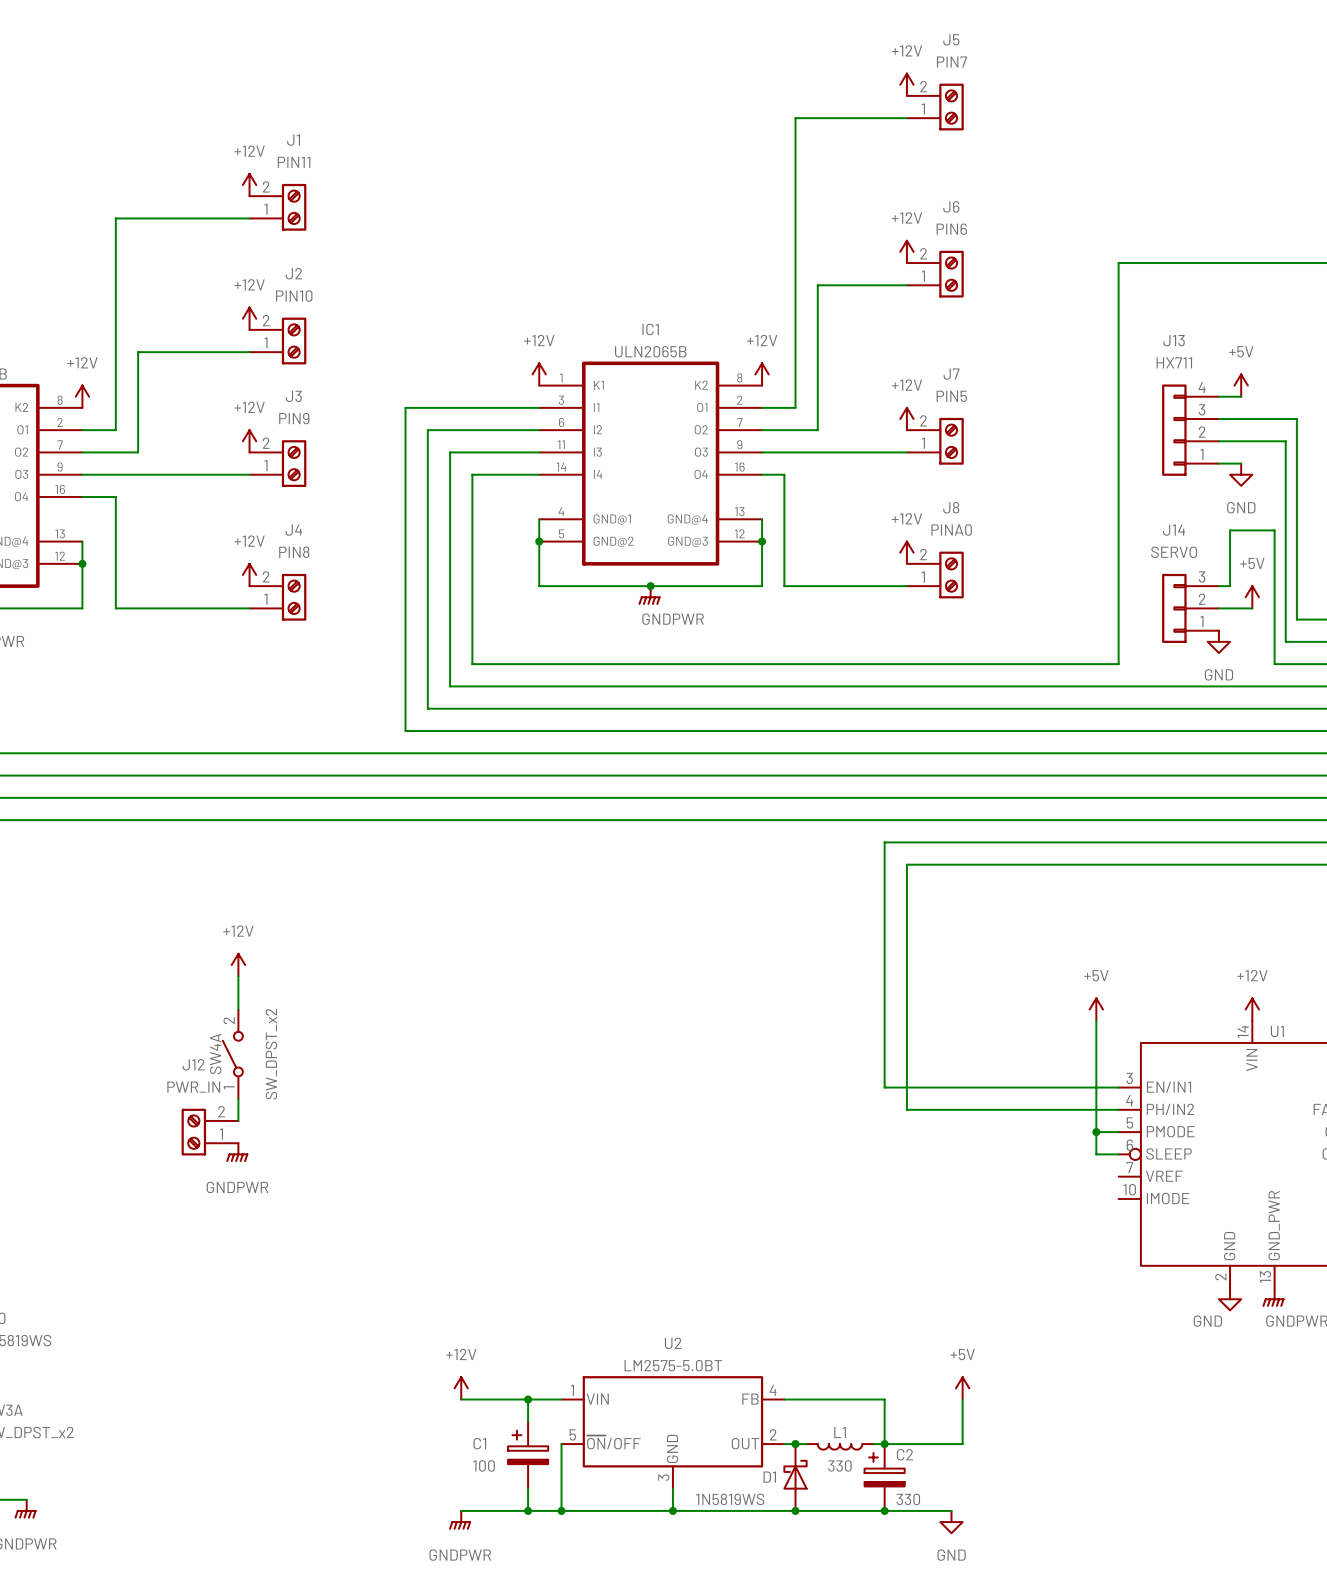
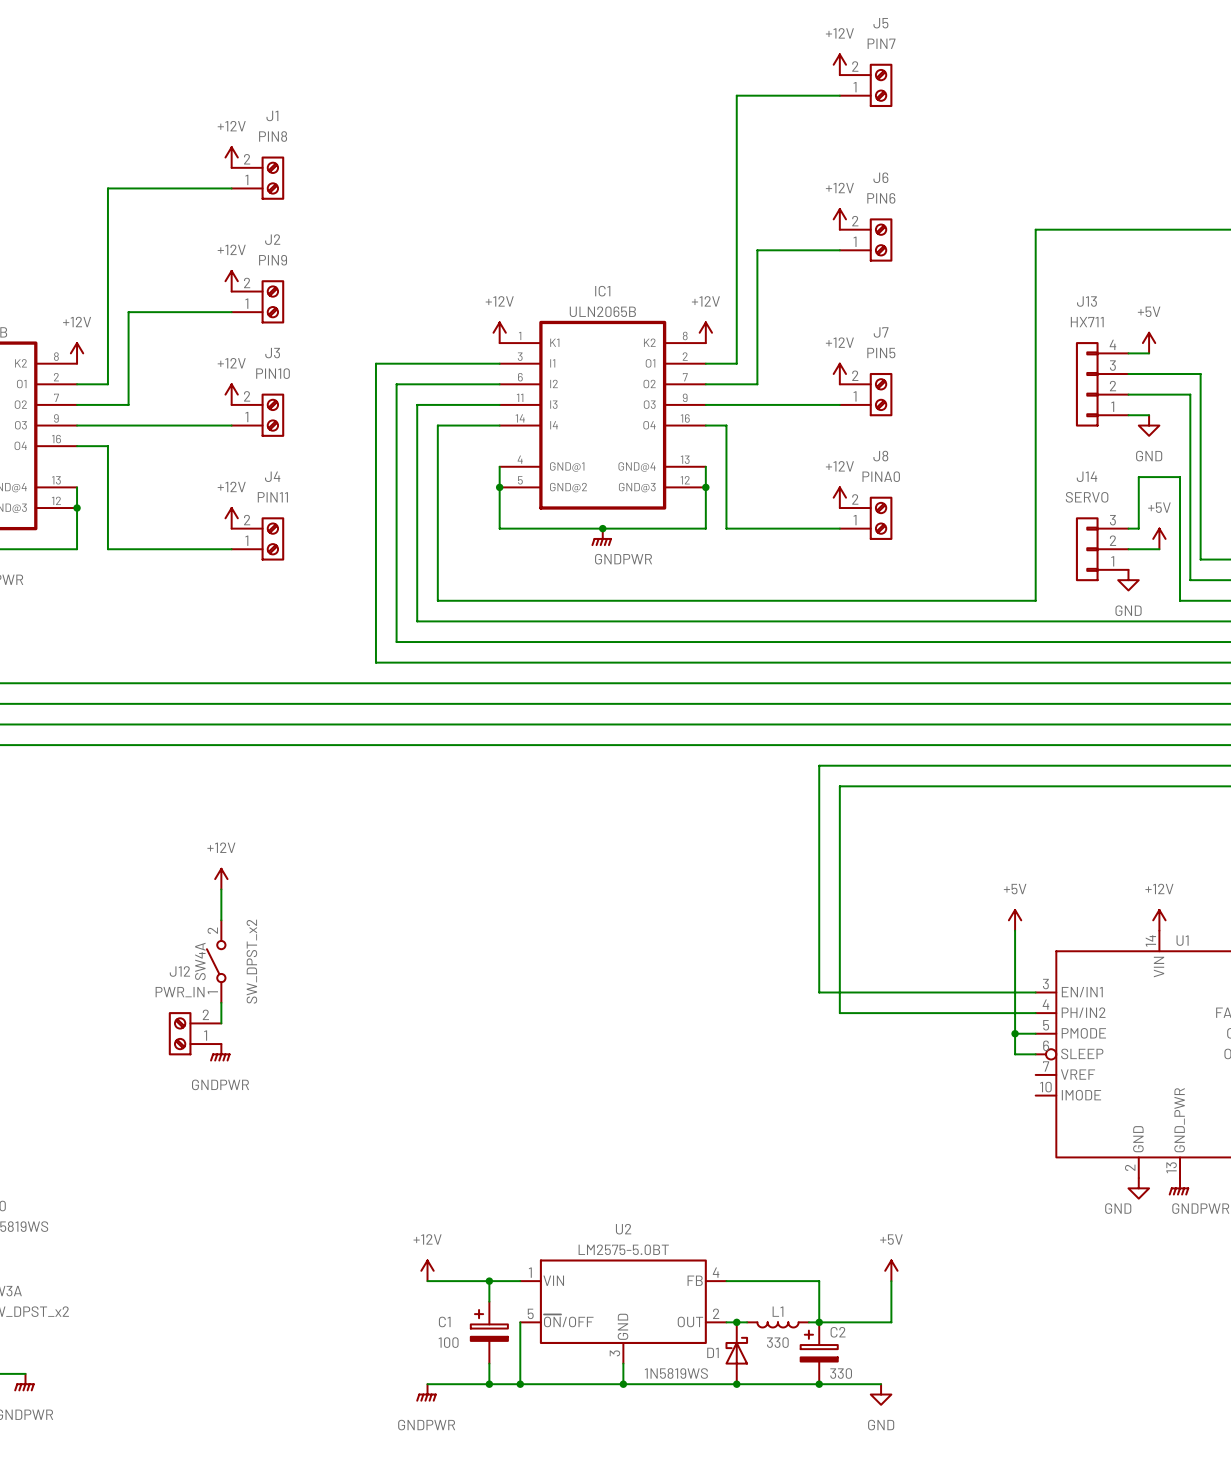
J1 value: PIN11 (294, 162) -> PIN8 (273, 136)
J2 value: PIN10 (294, 296) -> PIN9 (273, 260)
J3 value: PIN9 (294, 418) -> PIN10 (273, 373)
J4 value: PIN8 (294, 552) -> PIN11 (272, 497)

